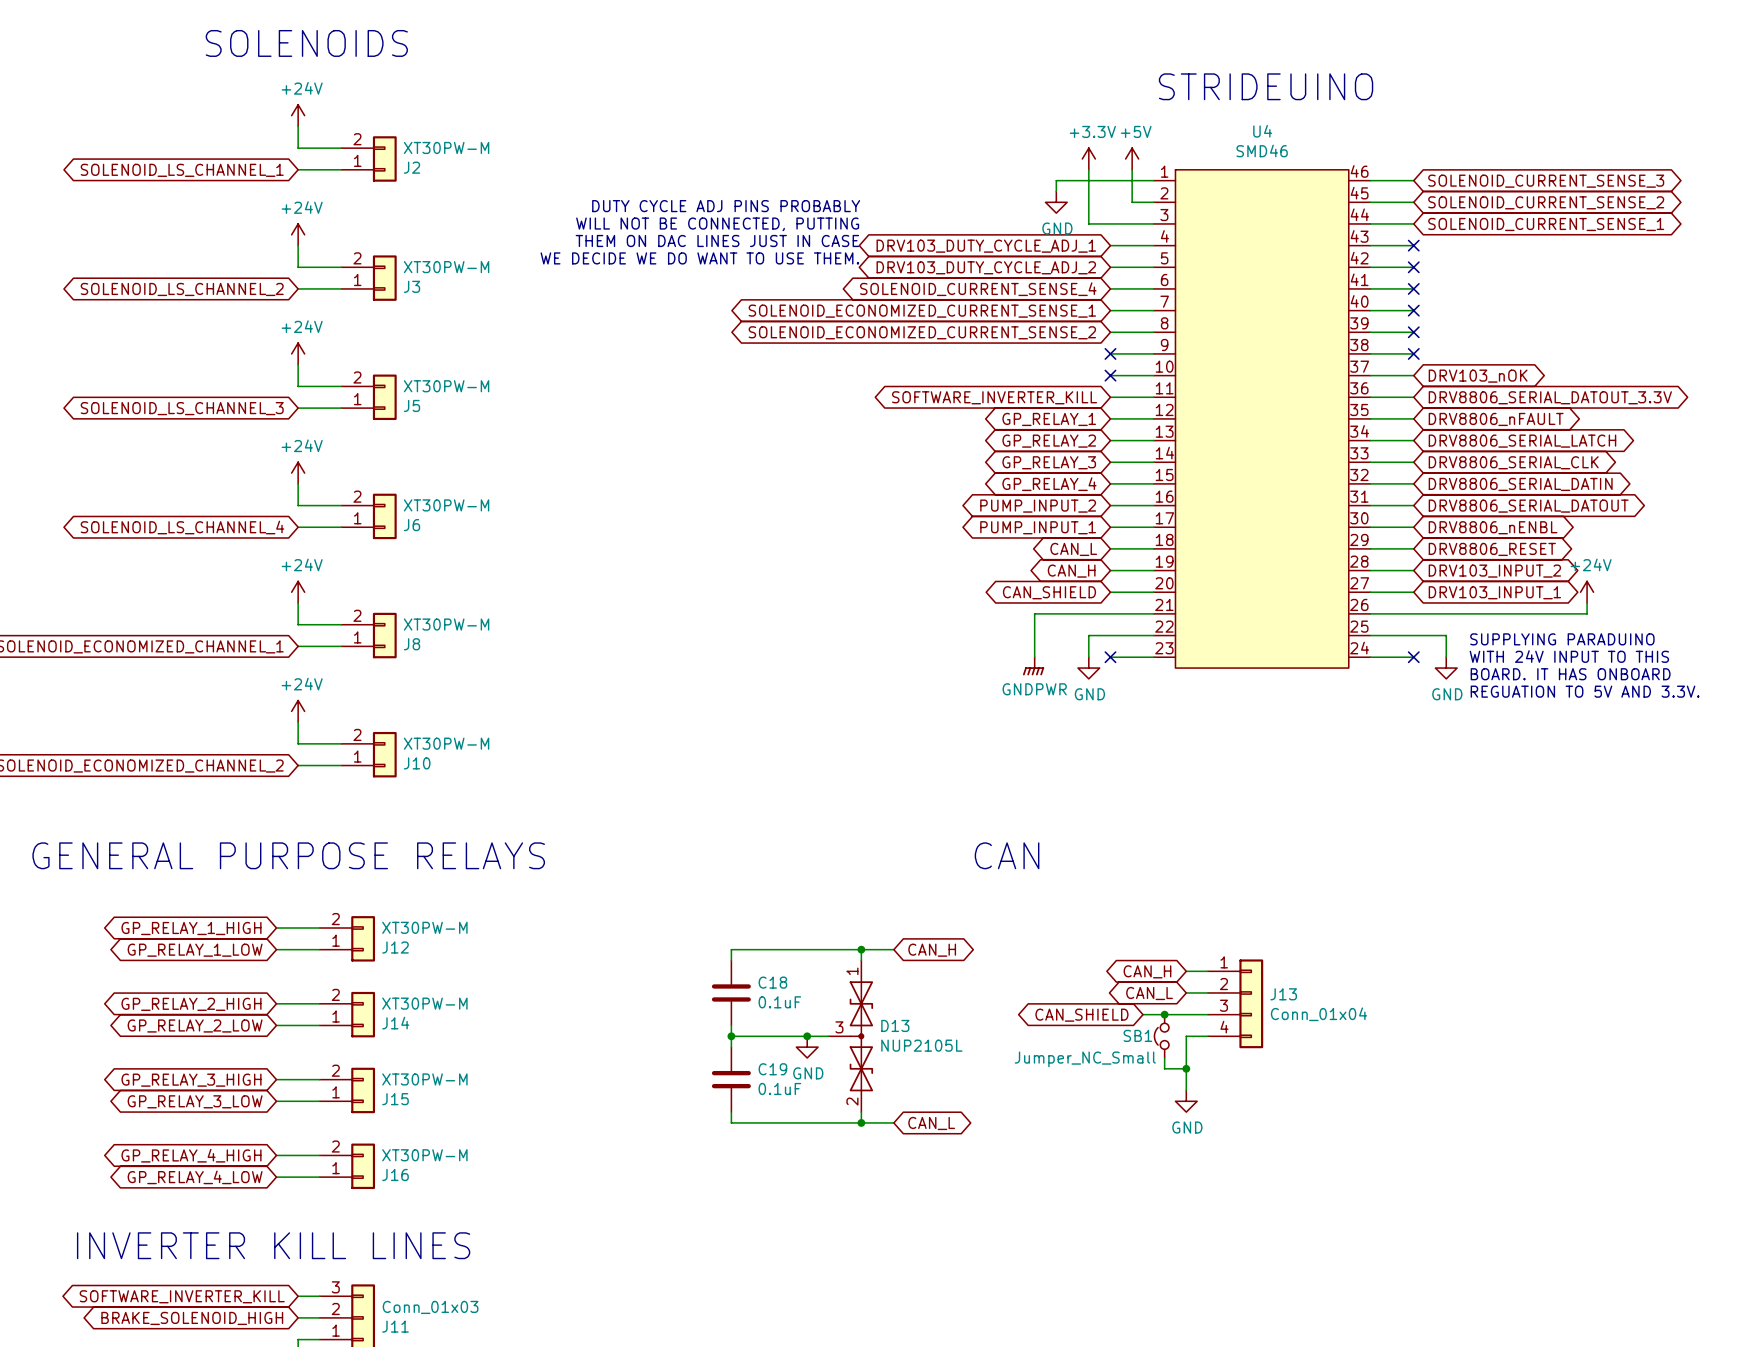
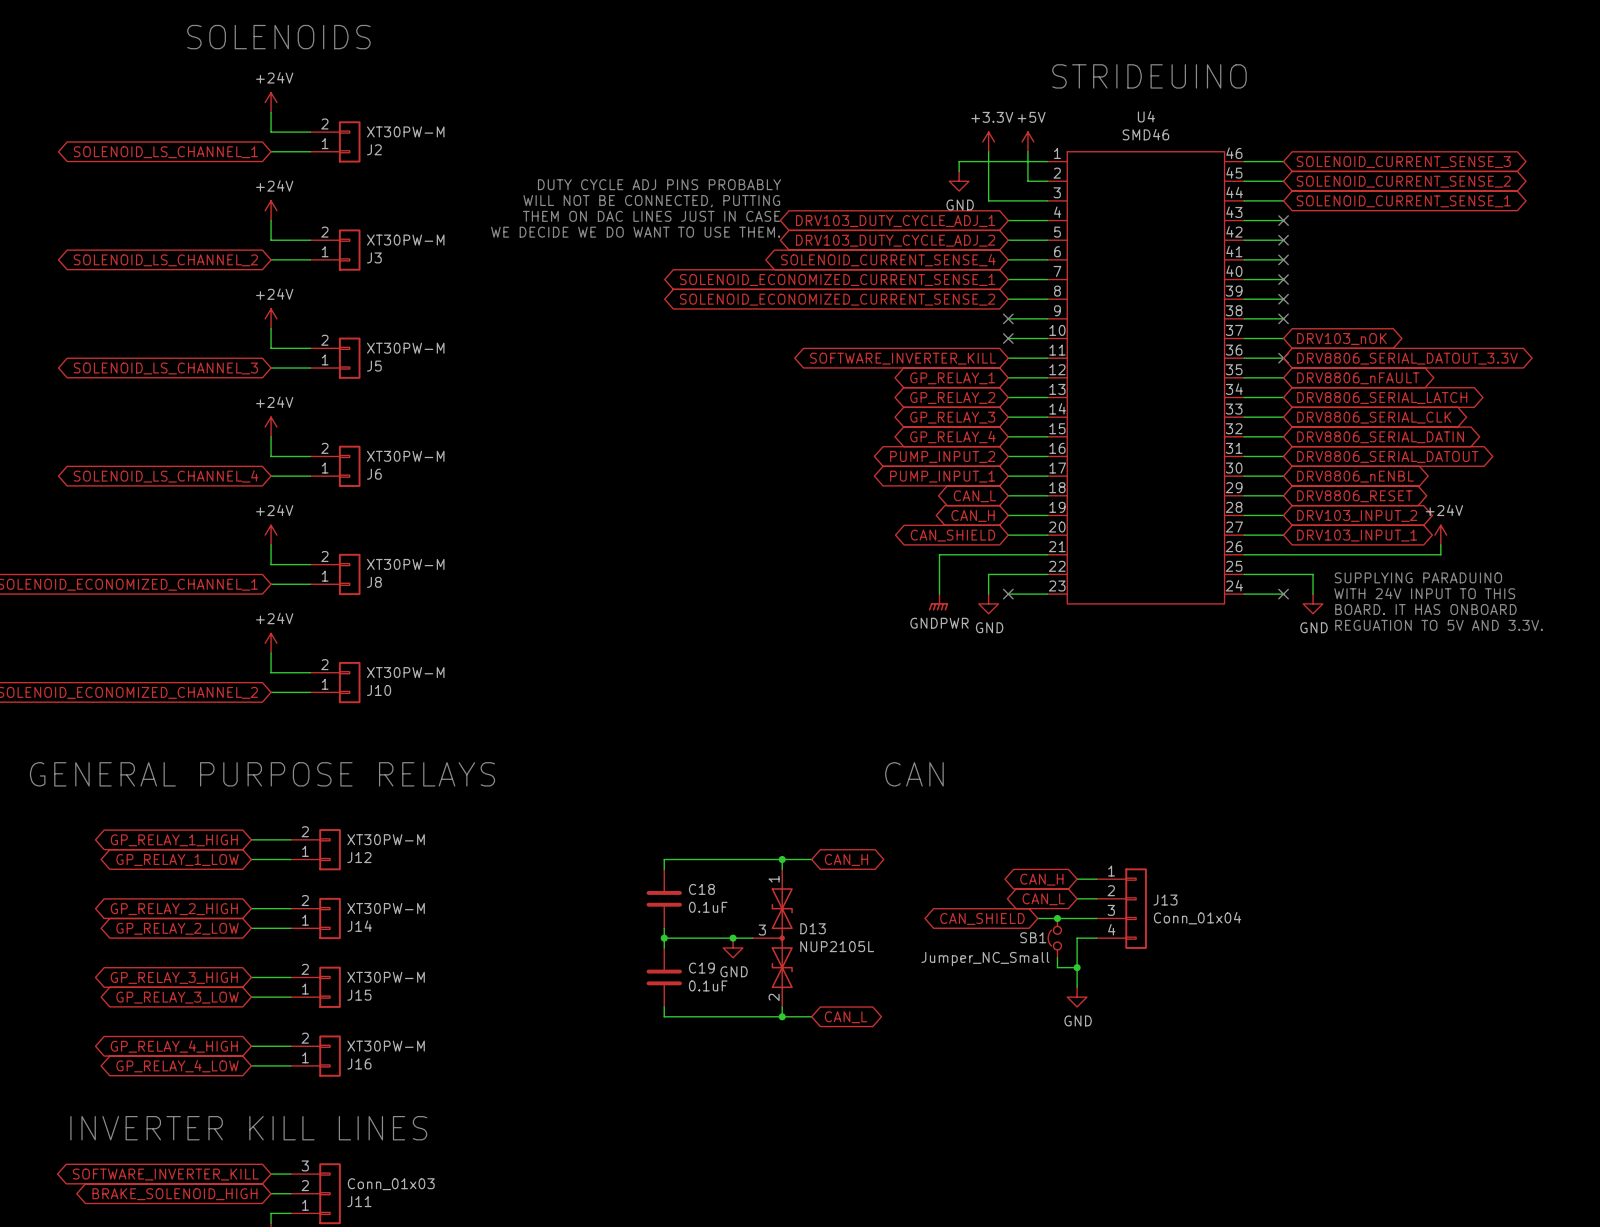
no-connect mark: none -> (1283, 358)

